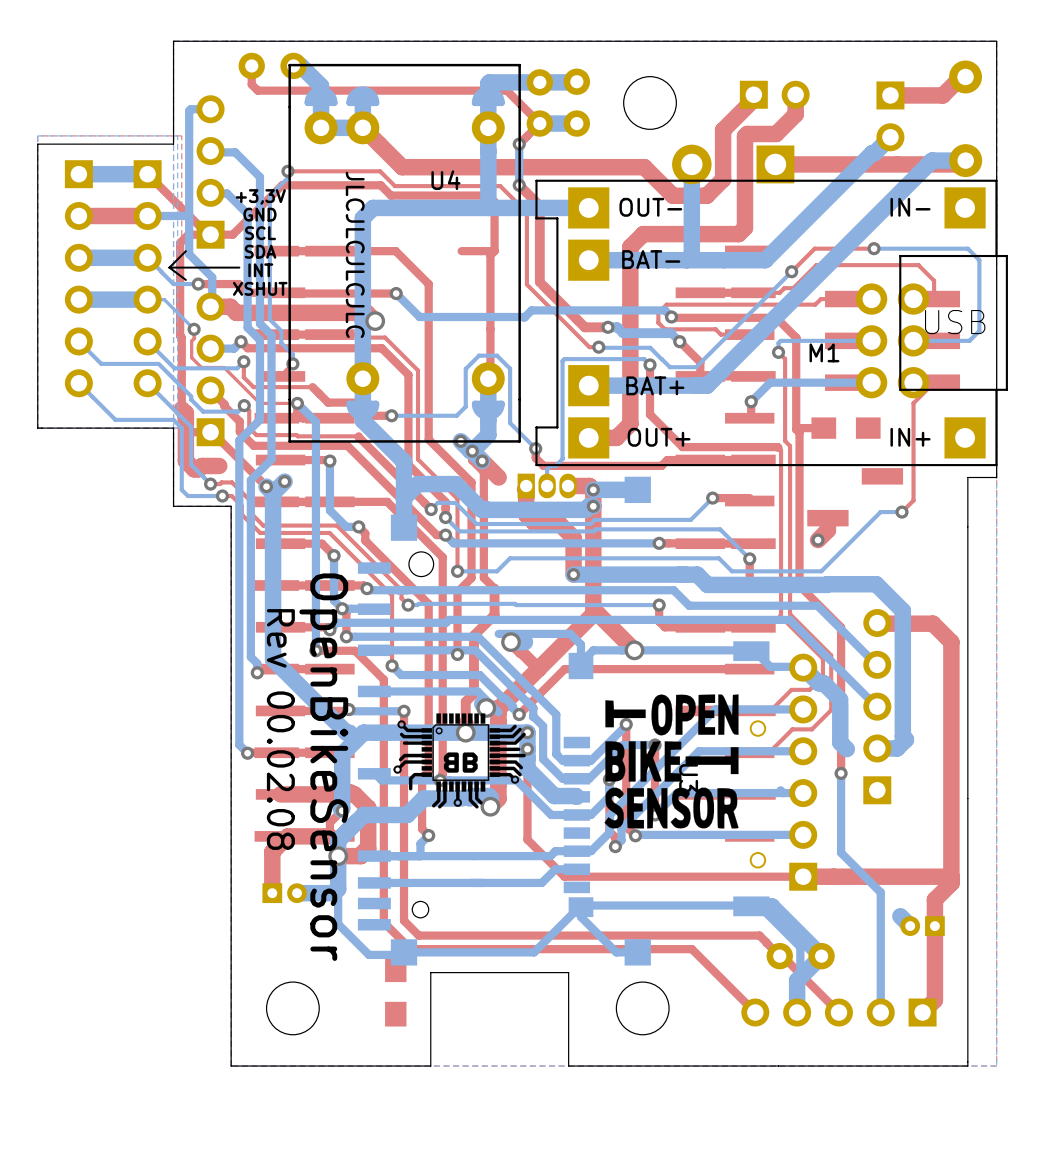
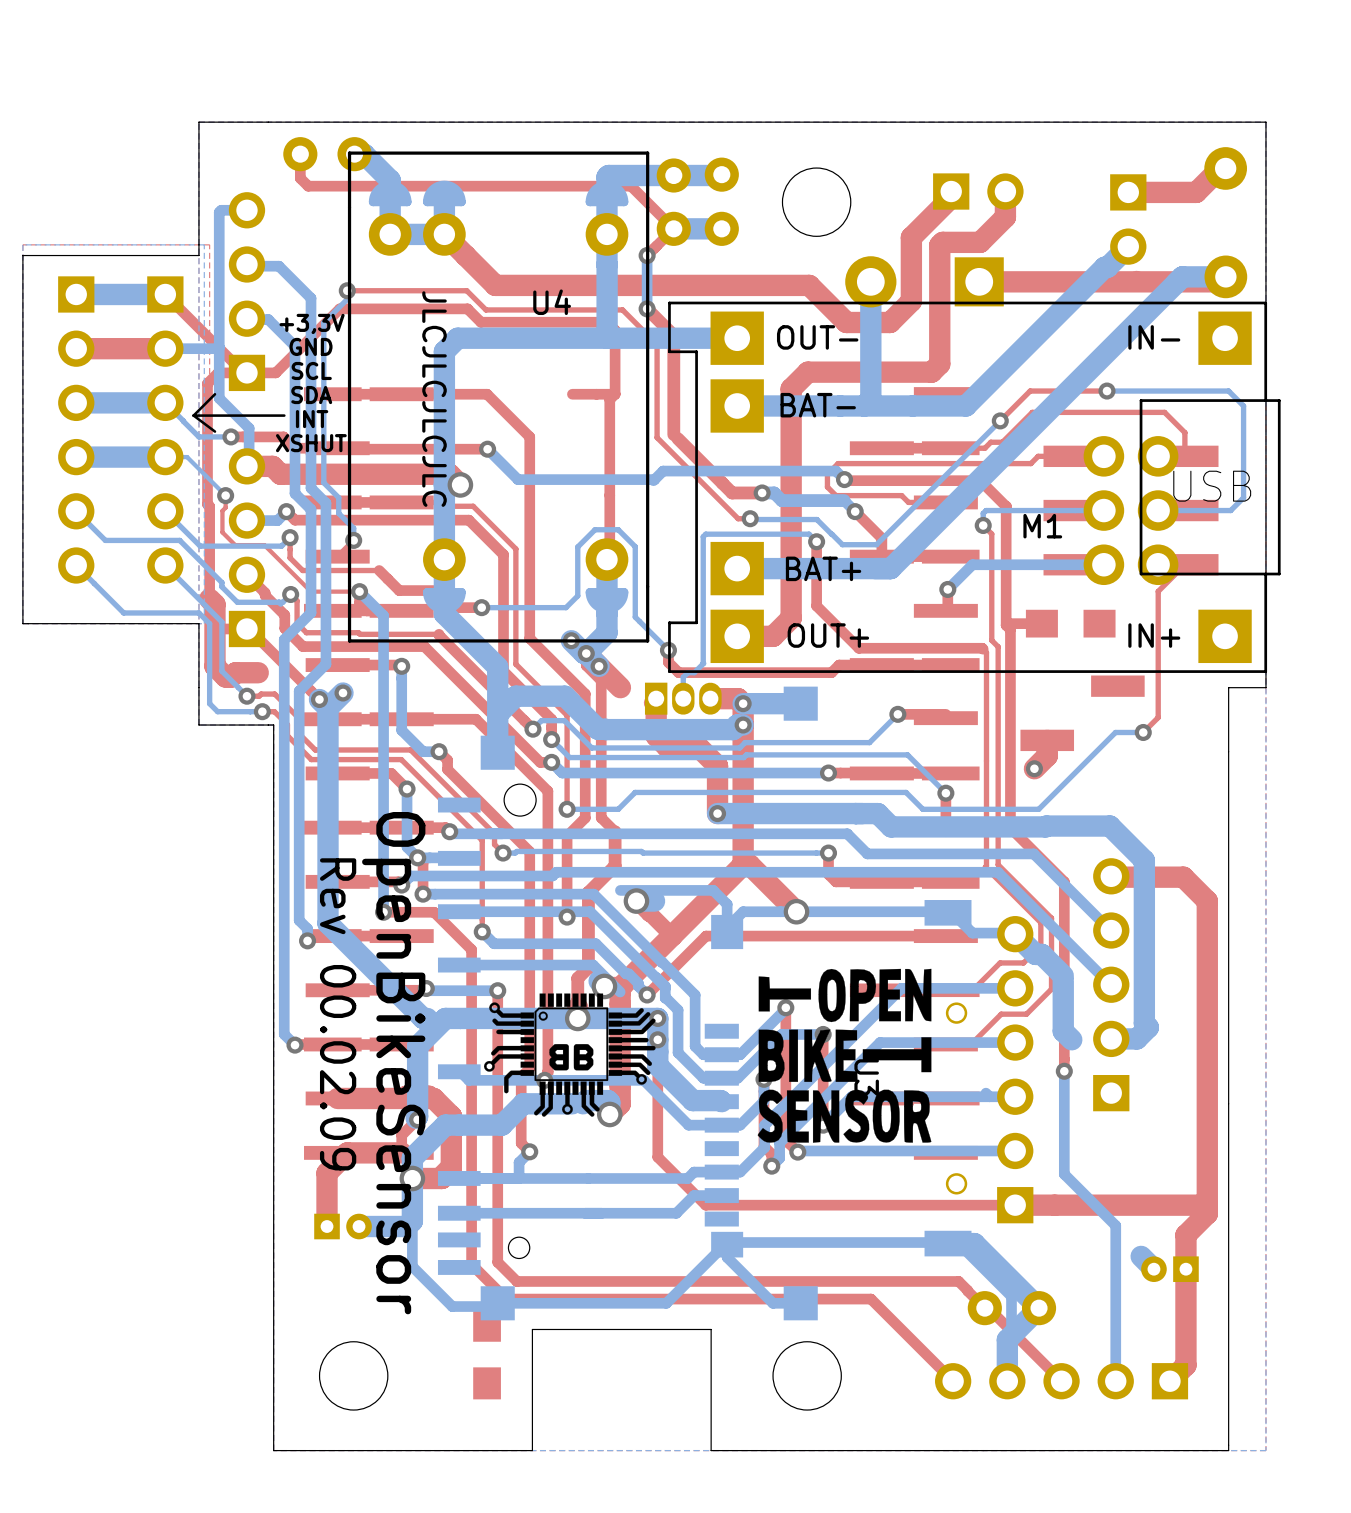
text: Rev 00.02.08 (280, 729) -> Rev 00.02.09 (338, 1014)

